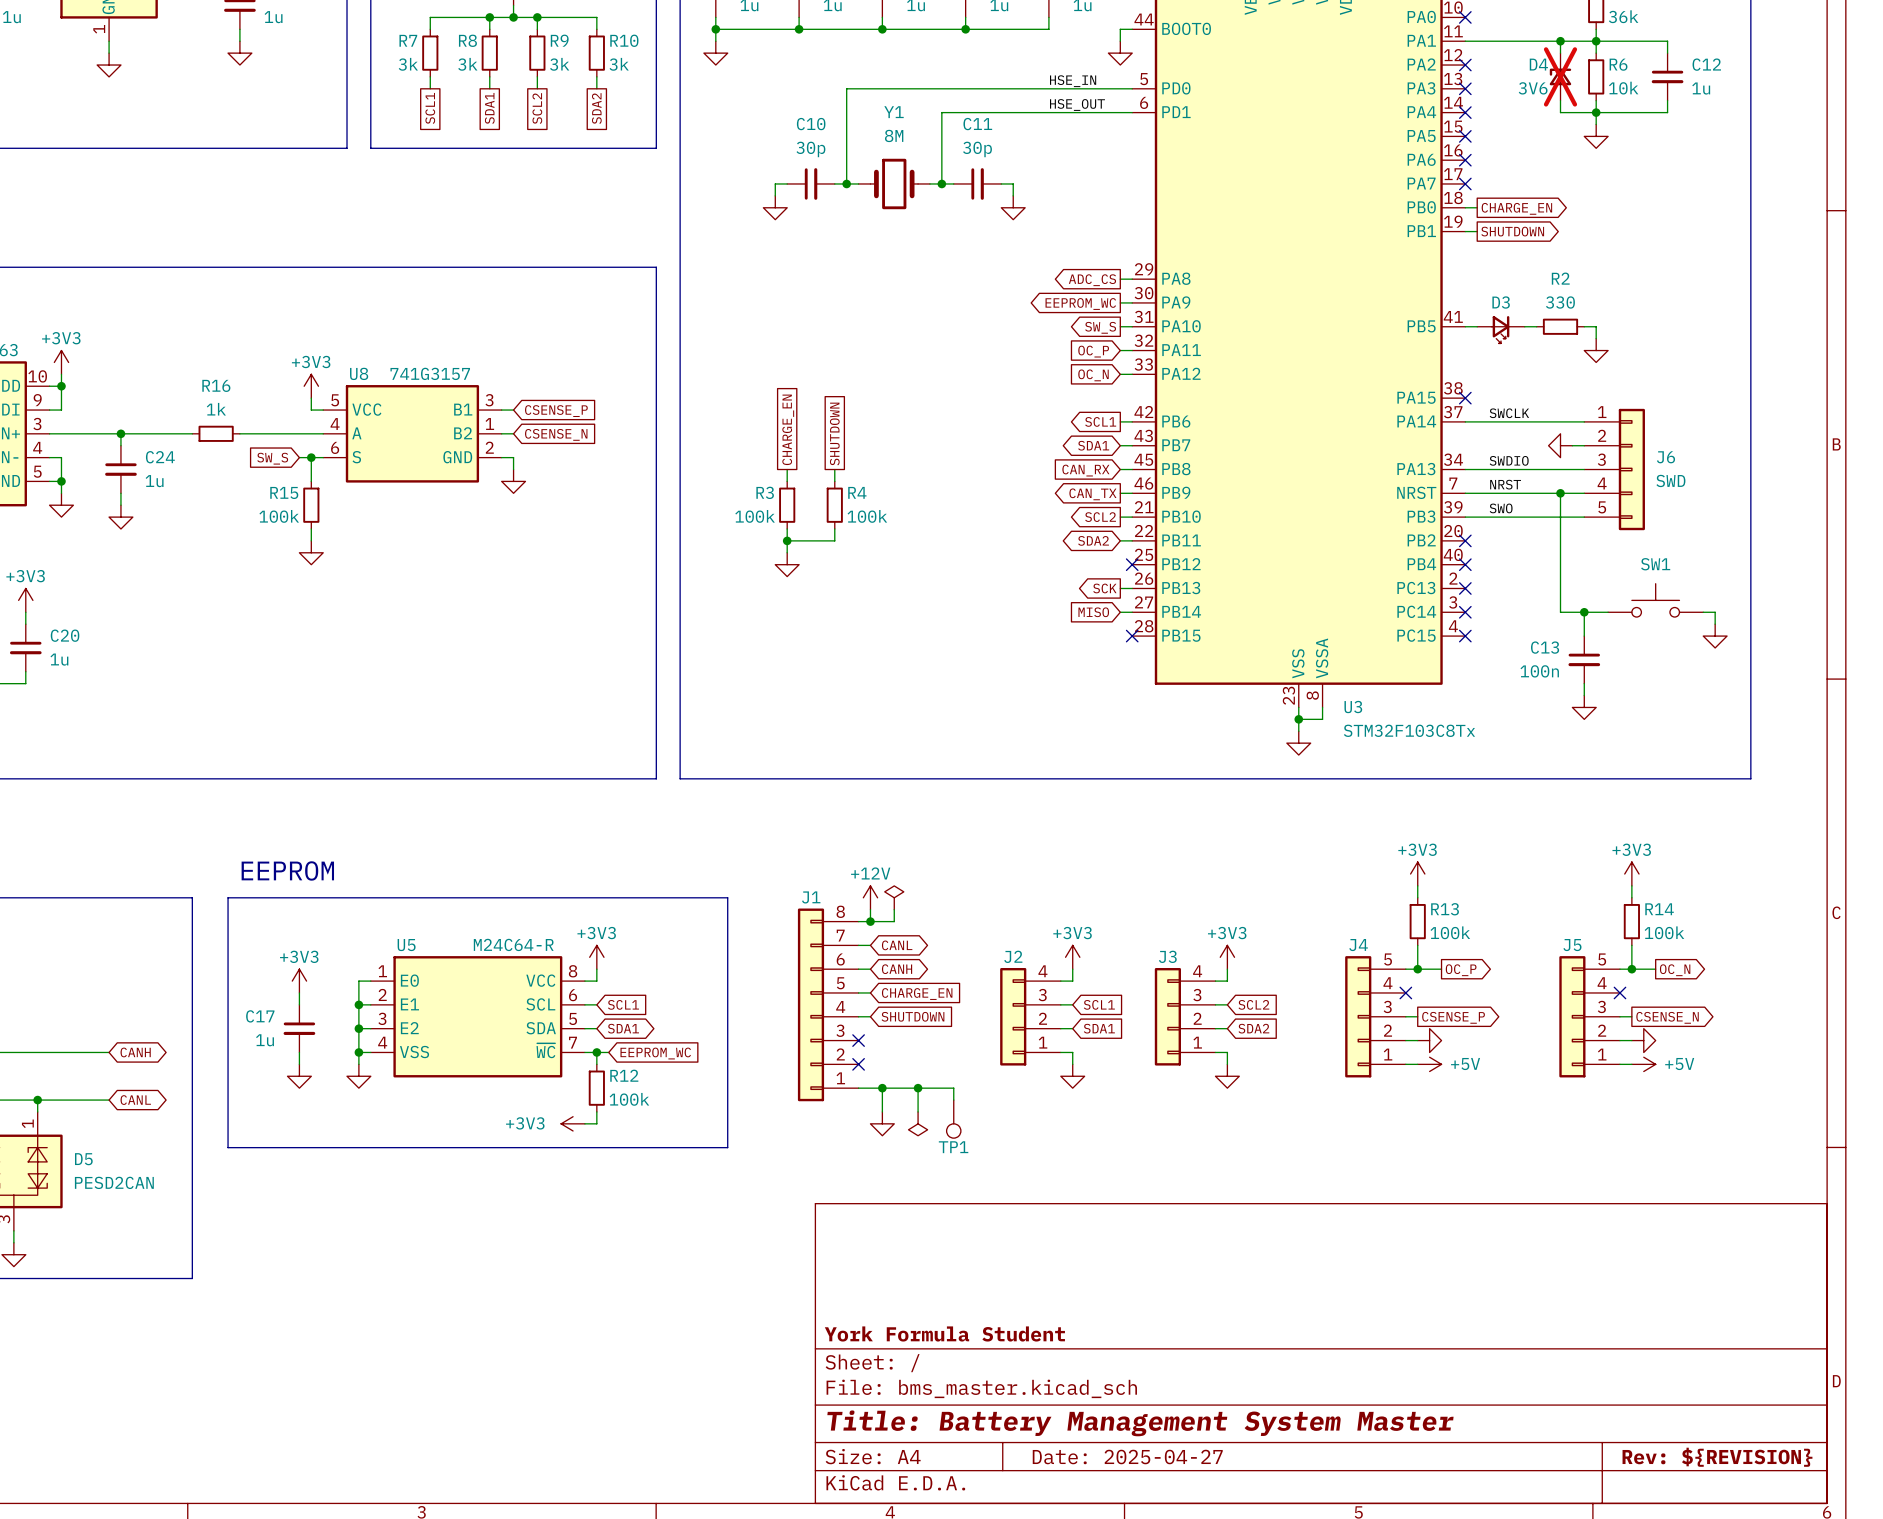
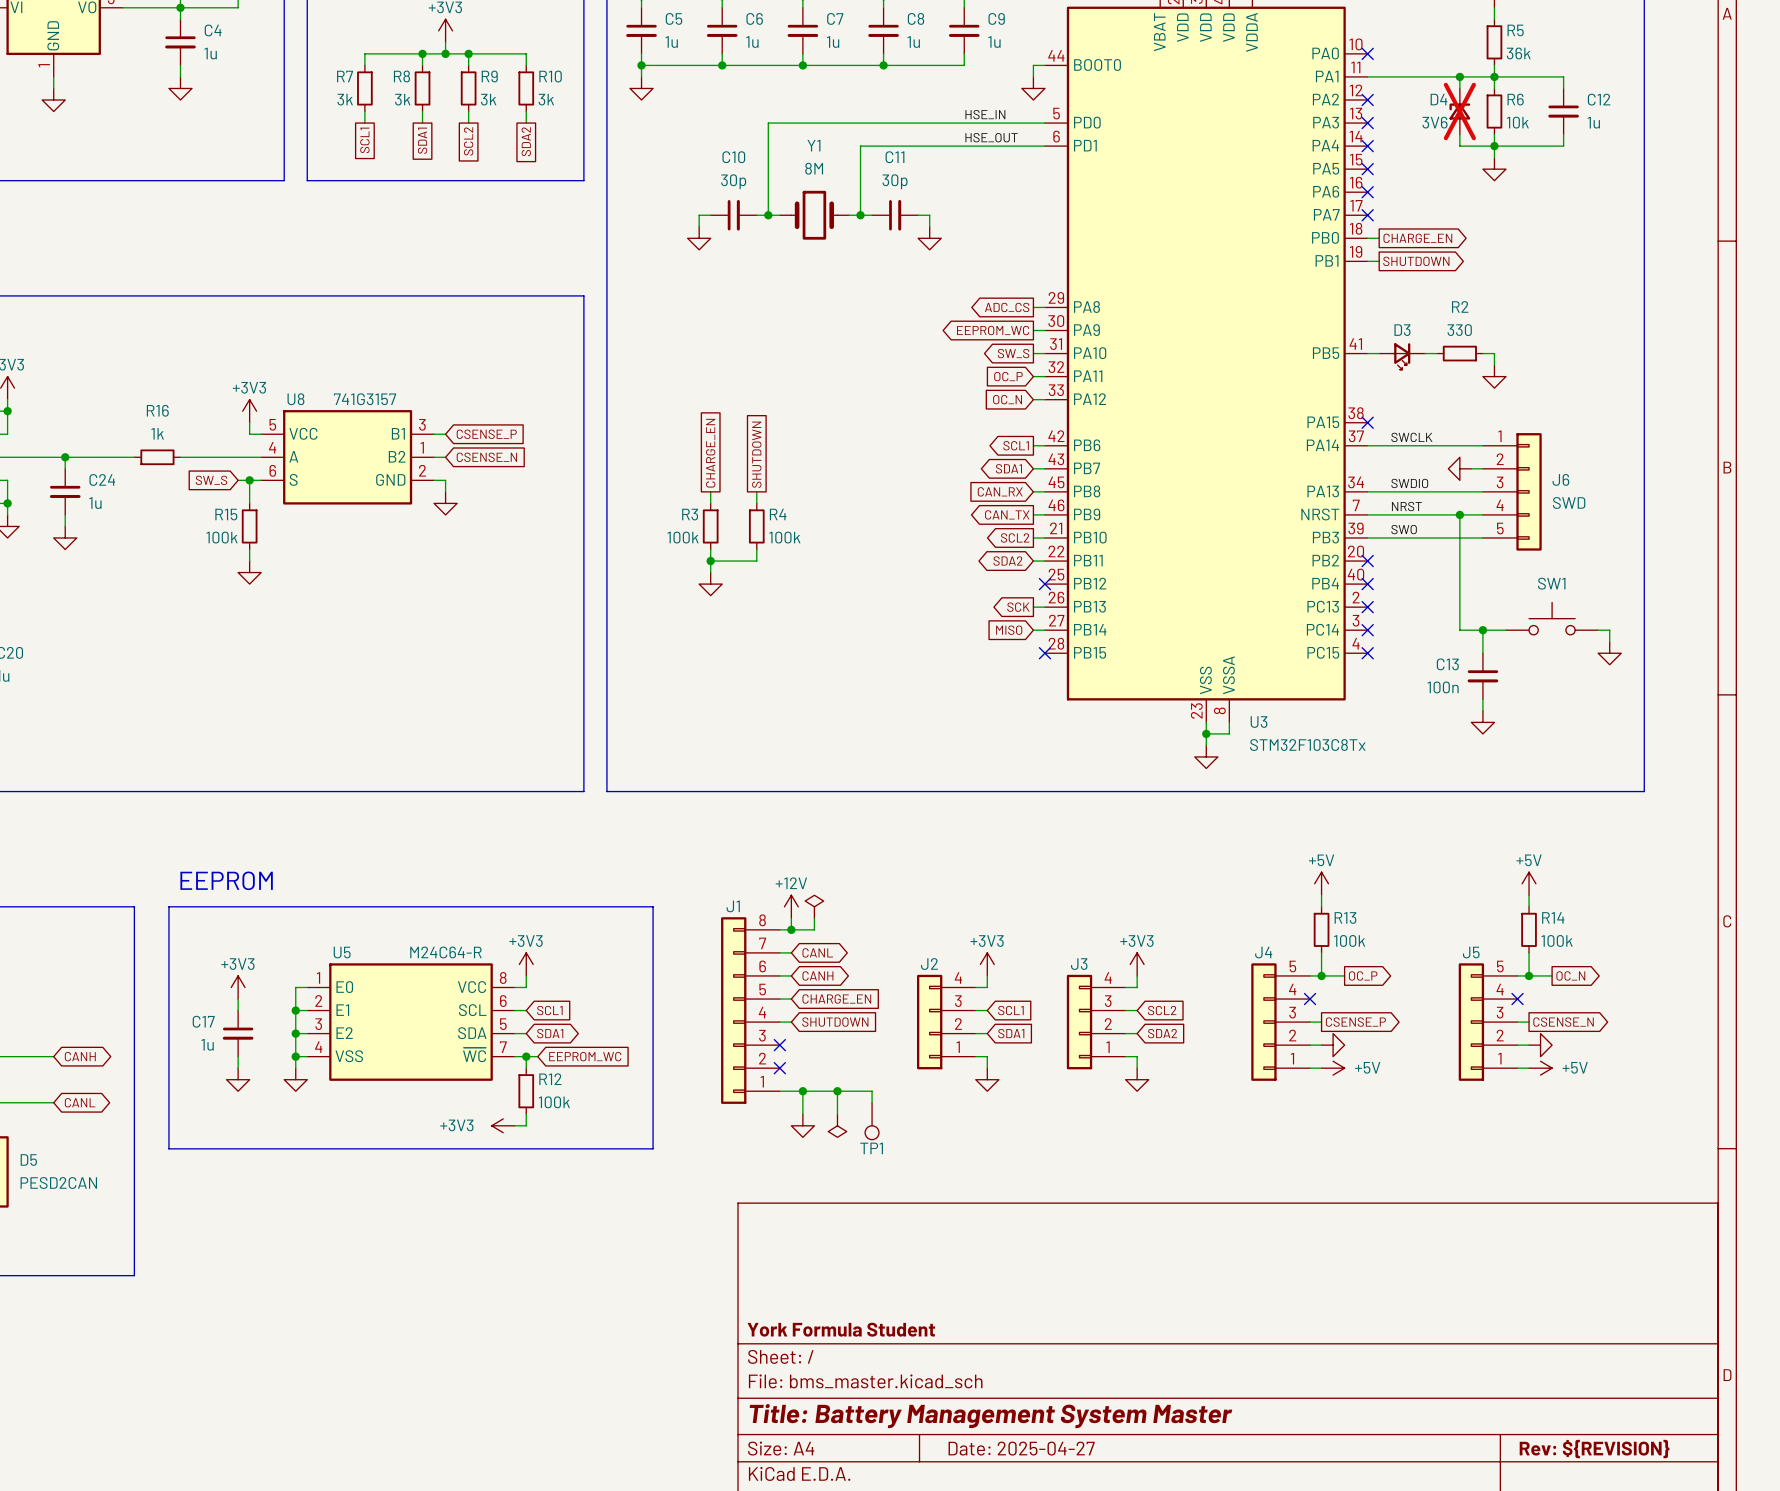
power symbol: +3V3 (1417, 874) -> +5V (1321, 883)
power symbol: +3V3 (1631, 874) -> +5V (1529, 883)

